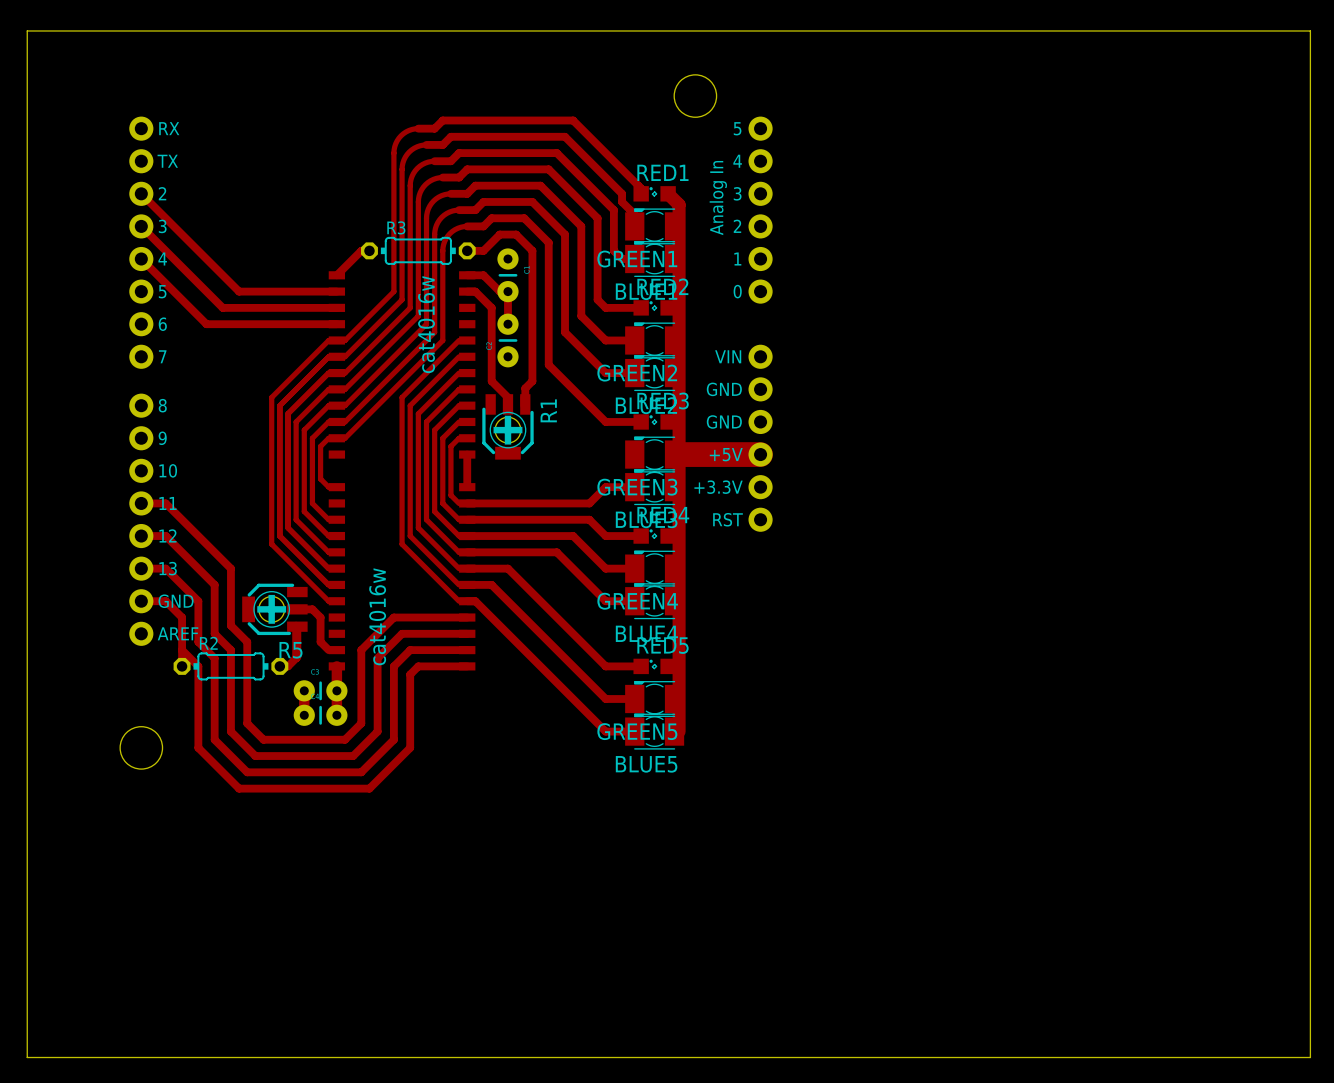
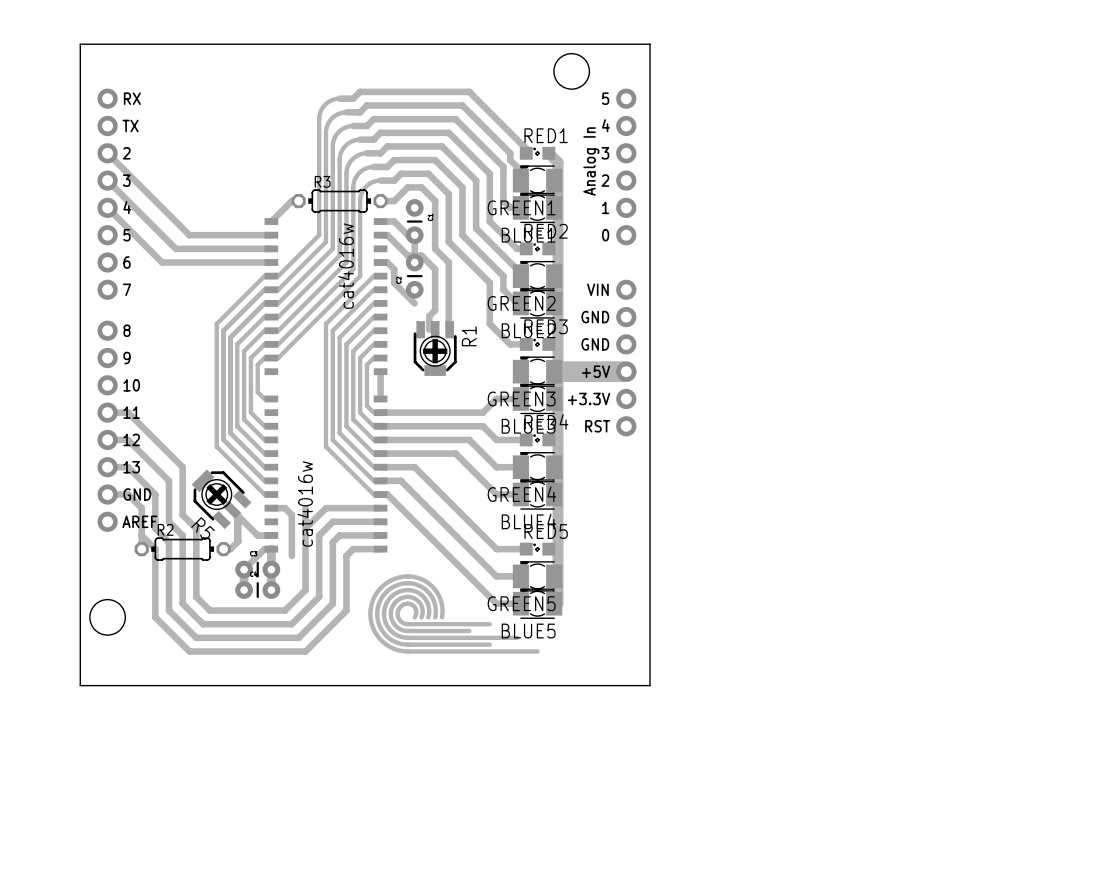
board edge: (27, 30) (1310, 30) (1310, 1057) (27, 1057) (27, 30) -> none
board edge: none -> (80, 44) (650, 44) (650, 685) (80, 685) (80, 44)
track: (597, 275) (597, 299) -> (476, 228) (489, 242)
track: none -> (489, 221) (517, 248)
track: (581, 283) (581, 316) (605, 340) (634, 340) -> none
track: (565, 291) (565, 332) (605, 373) (634, 373) -> (462, 235) (503, 276) (503, 289) (517, 303)
track: (548, 299) (548, 324) -> (435, 248) (448, 262)
track: (491, 307) (491, 381) (507, 397) -> none
track: (532, 307) (532, 332) -> (401, 248) (407, 255) (421, 255) (435, 269)
track: (605, 307) (630, 307) -> (496, 248) (517, 269) (517, 276)
track: none -> (380, 262) (387, 262) (394, 269) (394, 282) (414, 303)
track: (548, 364) (605, 421) (622, 421) -> (448, 242) (489, 282) (489, 323) (510, 344)
track: none -> (448, 296) (448, 330)
R1 position: (507, 426) -> (435, 348)
R5 rotation: 0° (274, 609) -> 45° clockwise (221, 499)
track: (297, 609) (312, 609) (320, 617) (320, 641) (328, 650) -> none
track: none -> (230, 508) (257, 535) (271, 535)
track: none -> (271, 508) (285, 508) (291, 515) (291, 535)
track: none -> (305, 508) (305, 542)
track: (402, 617) (393, 617) (361, 650) -> (325, 508) (305, 528)
track: (410, 633) (402, 633) (377, 658) -> (332, 521) (319, 535) (319, 549)
track: (418, 650) (410, 650) (393, 666) -> (339, 535) (332, 542) (332, 555)
track: none -> (271, 549) (264, 549) (244, 569)
track: (434, 666) (418, 666) (410, 674) -> (353, 549) (346, 555) (346, 610) (305, 651) (298, 651)
track: (361, 674) (361, 723) (345, 739) -> none
track: (377, 715) (377, 731) (353, 756) -> (305, 590) (285, 610) (278, 610)
track: (393, 723) (393, 739) (361, 772) -> (319, 596) (291, 624) (285, 624)
track: (410, 731) (410, 747) (369, 788) -> (332, 603) (298, 637) (291, 637)
track: none -> (414, 617) (416, 610) (411, 604) (405, 604) (399, 608) (398, 617) (406, 624) (489, 624)
track: none -> (421, 617) (421, 605) (411, 597) (399, 599) (391, 609) (393, 622) (403, 630) (469, 631)
track: none -> (428, 617) (428, 607) (424, 598) (419, 593) (410, 590) (401, 590) (393, 595) (387, 602) (384, 610) (384, 620) (388, 628) (401, 637) (517, 637)
track: none -> (435, 617) (435, 606) (431, 596) (424, 588) (411, 583) (399, 584) (389, 589) (381, 598) (377, 609) (377, 617) (381, 629) (389, 638) (399, 643) (489, 644)
track: none -> (442, 617) (440, 600) (434, 588) (424, 580) (412, 576) (398, 577) (385, 584) (375, 595) (370, 609) (371, 623) (378, 636) (385, 643) (398, 650) (537, 651)

